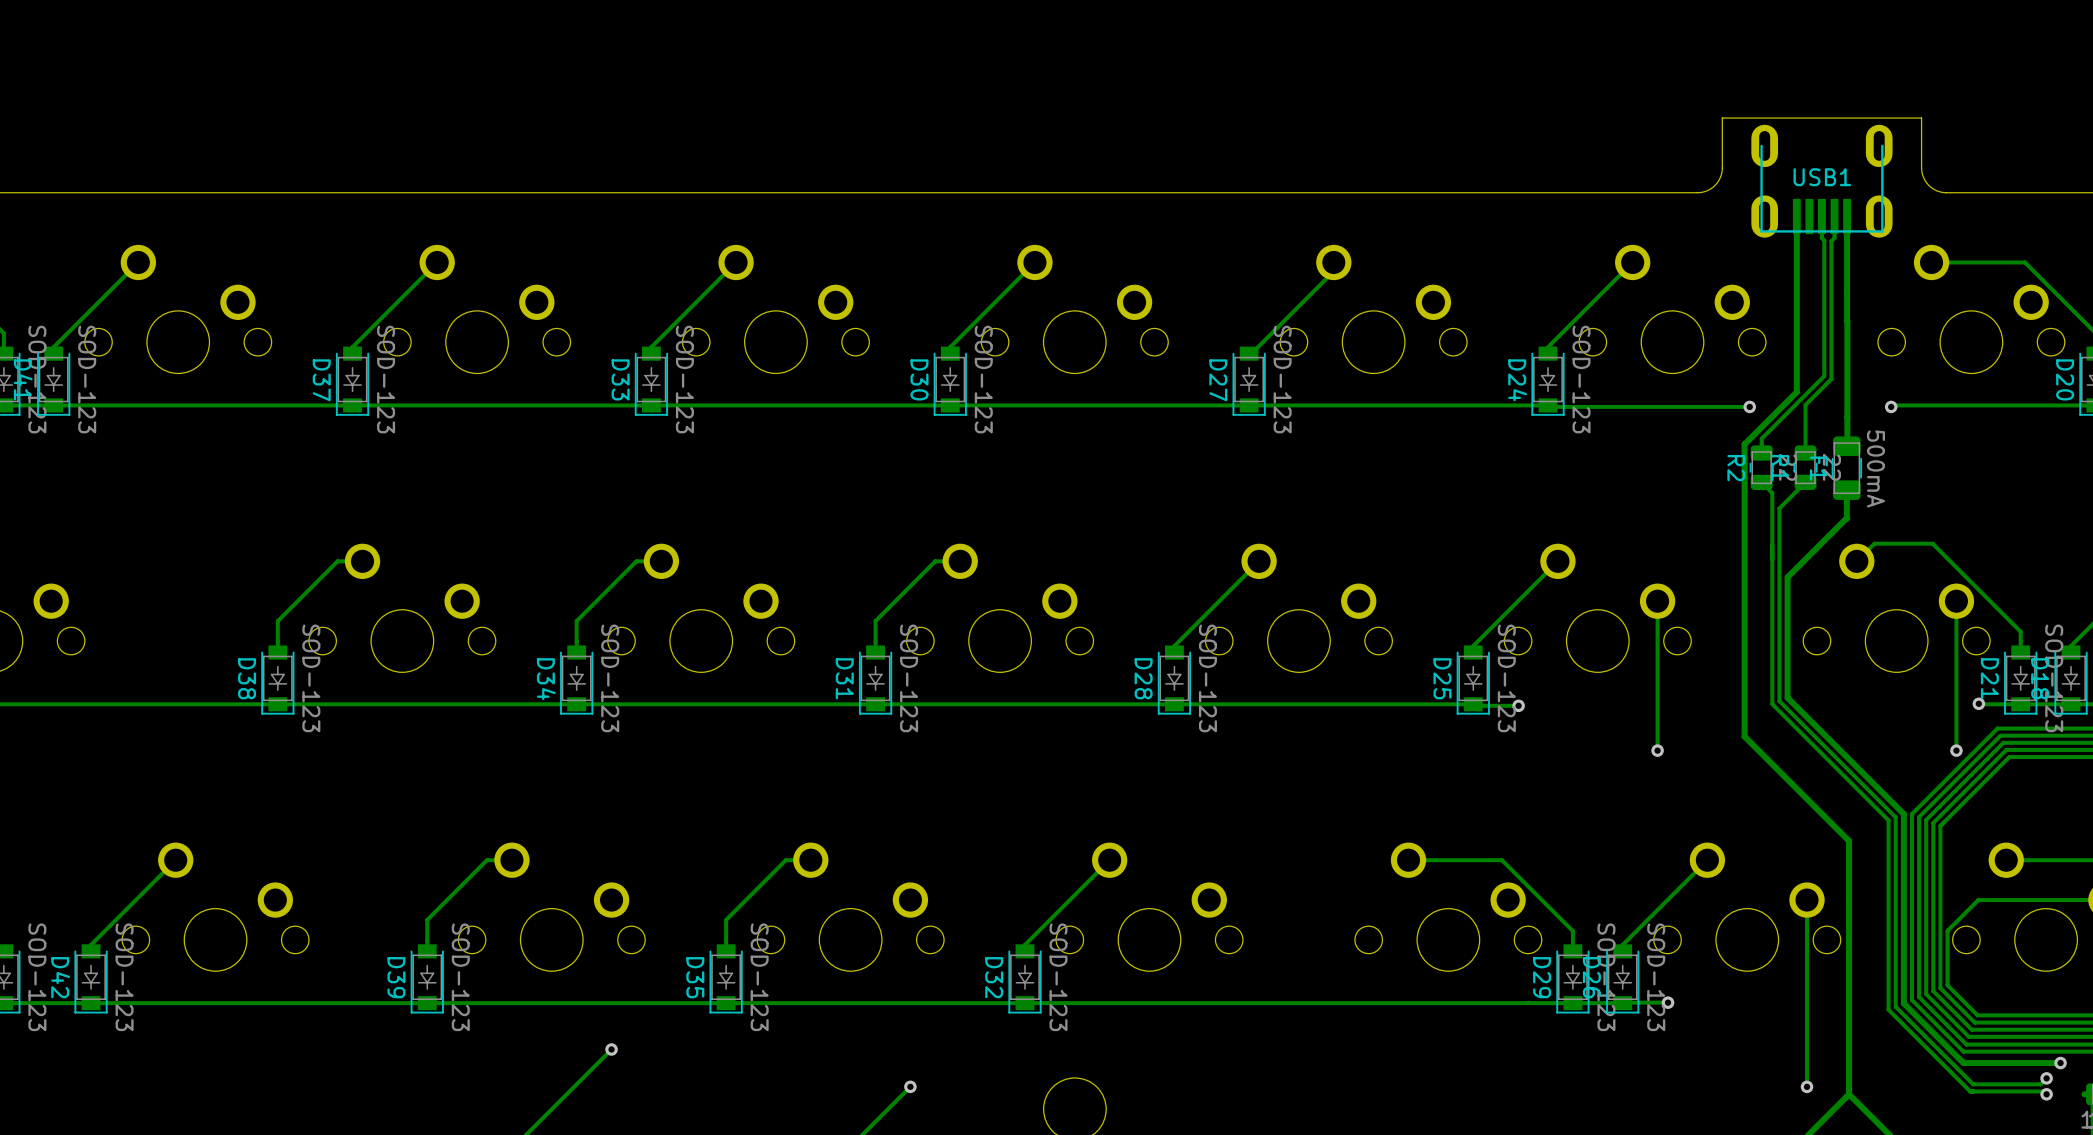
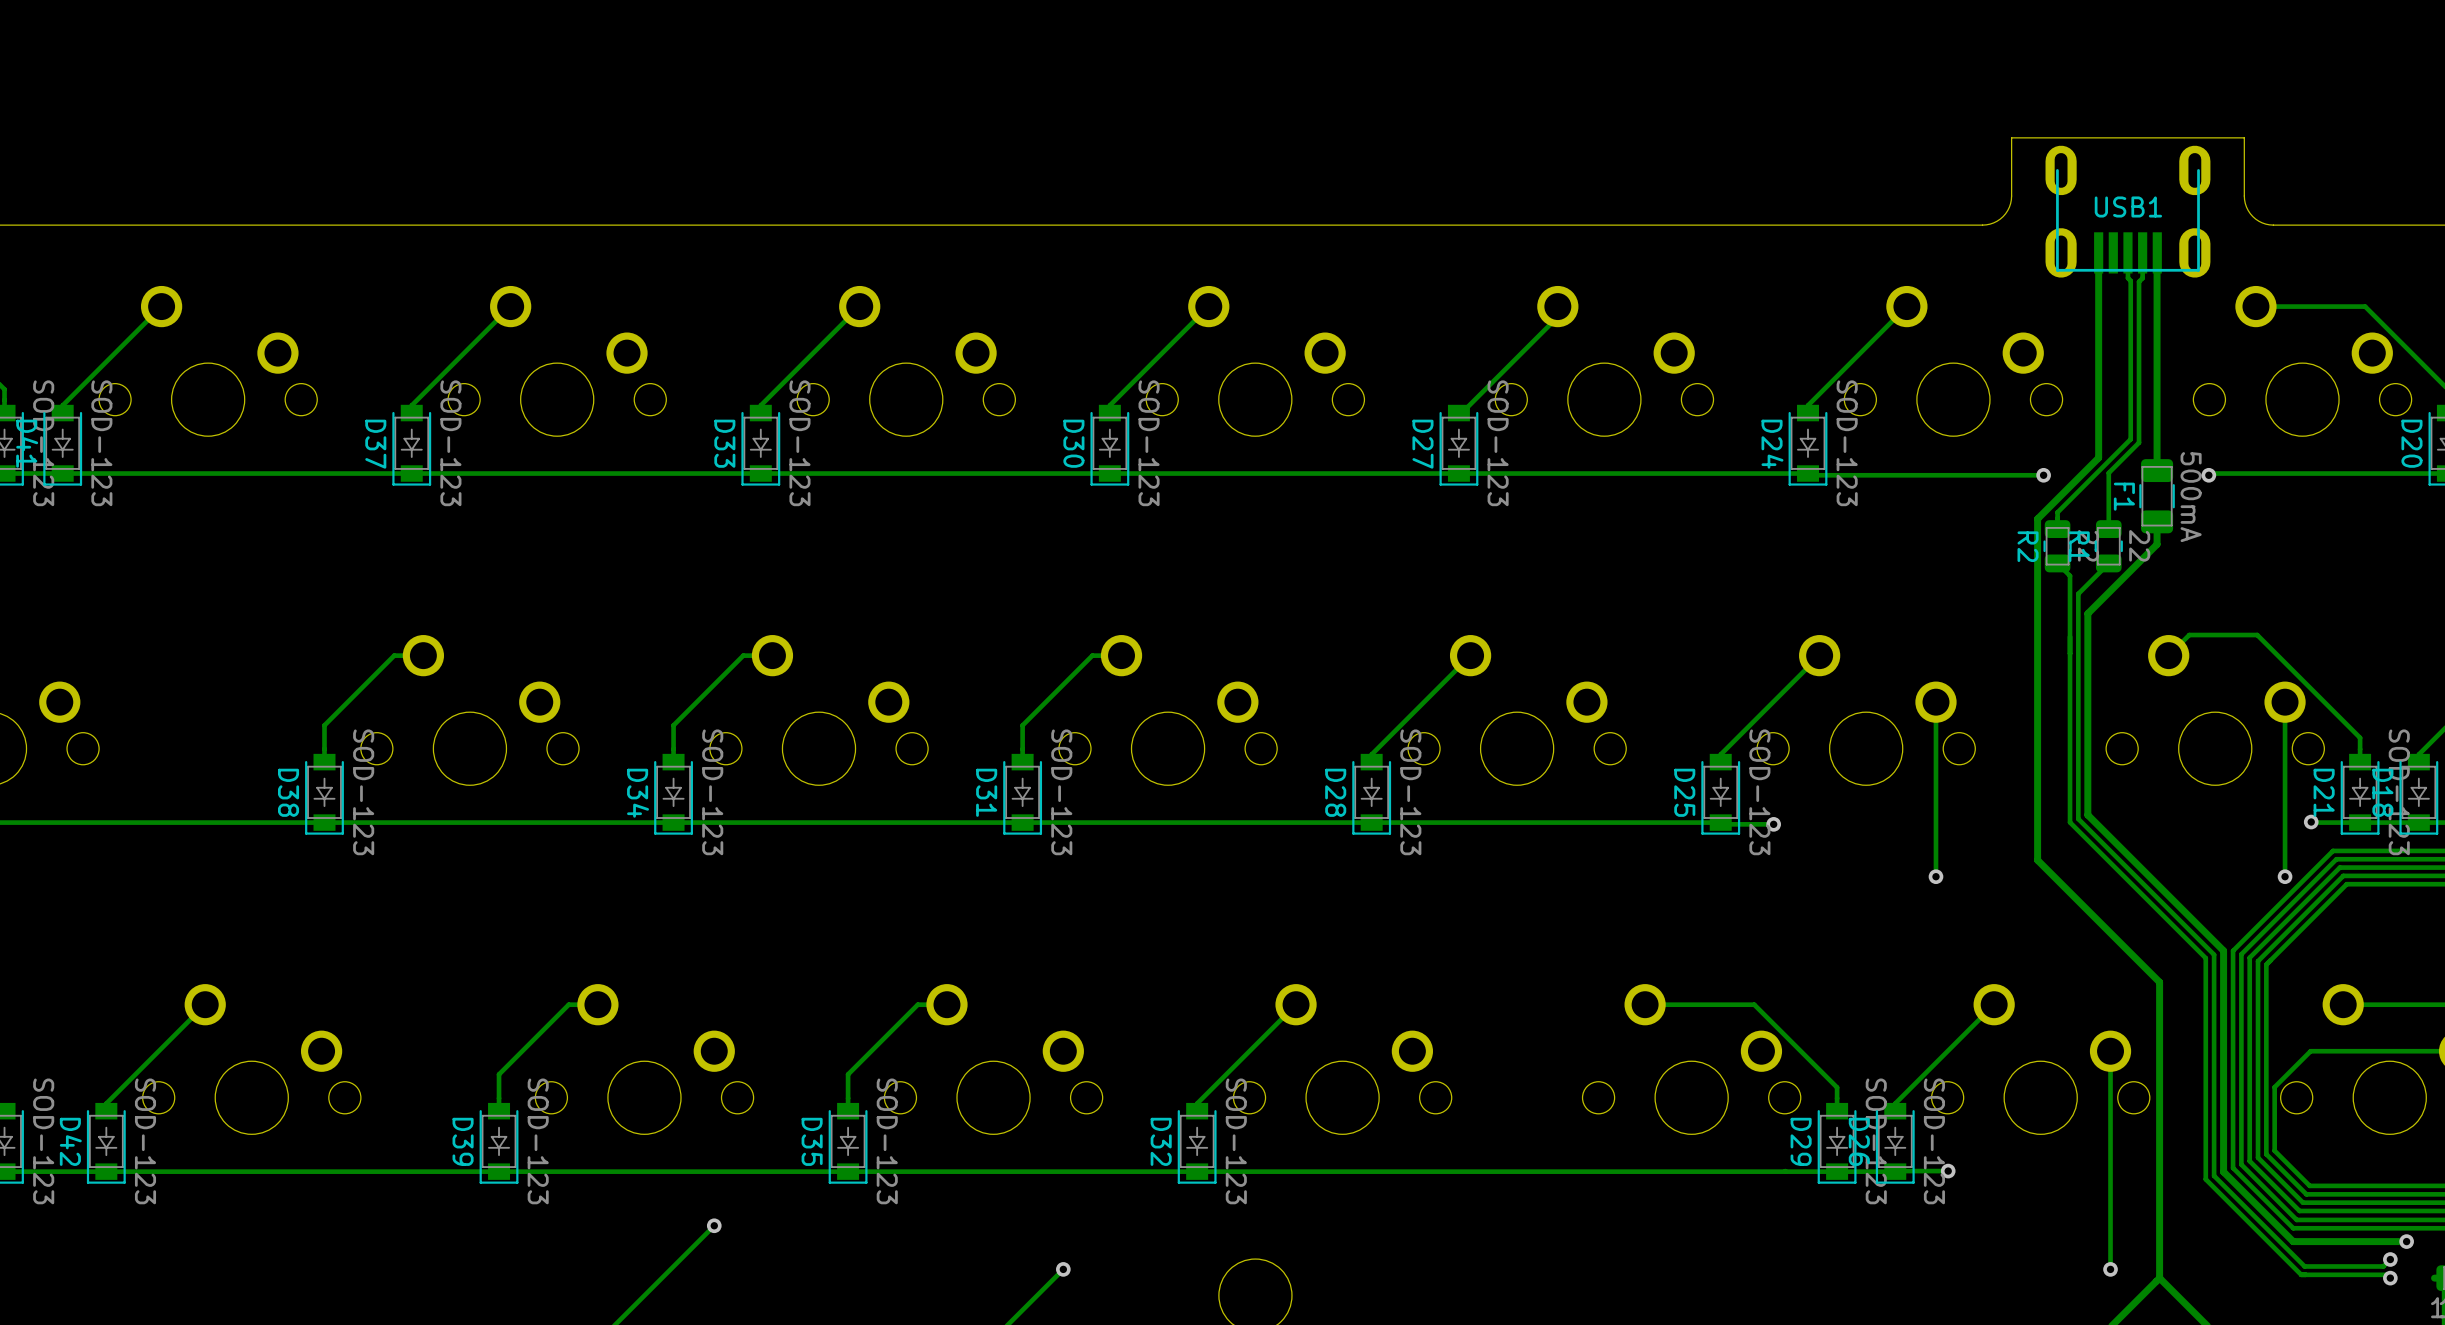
track: (1847, 216) (1846, 446) -> (2157, 253) (2157, 470)
F1 position: (1846, 468) -> (2157, 496)
track: (1846, 490) (1846, 518) -> none
track: (1846, 518) (1787, 577) -> (2157, 521) (2157, 544) (2087, 613) (2087, 674)

